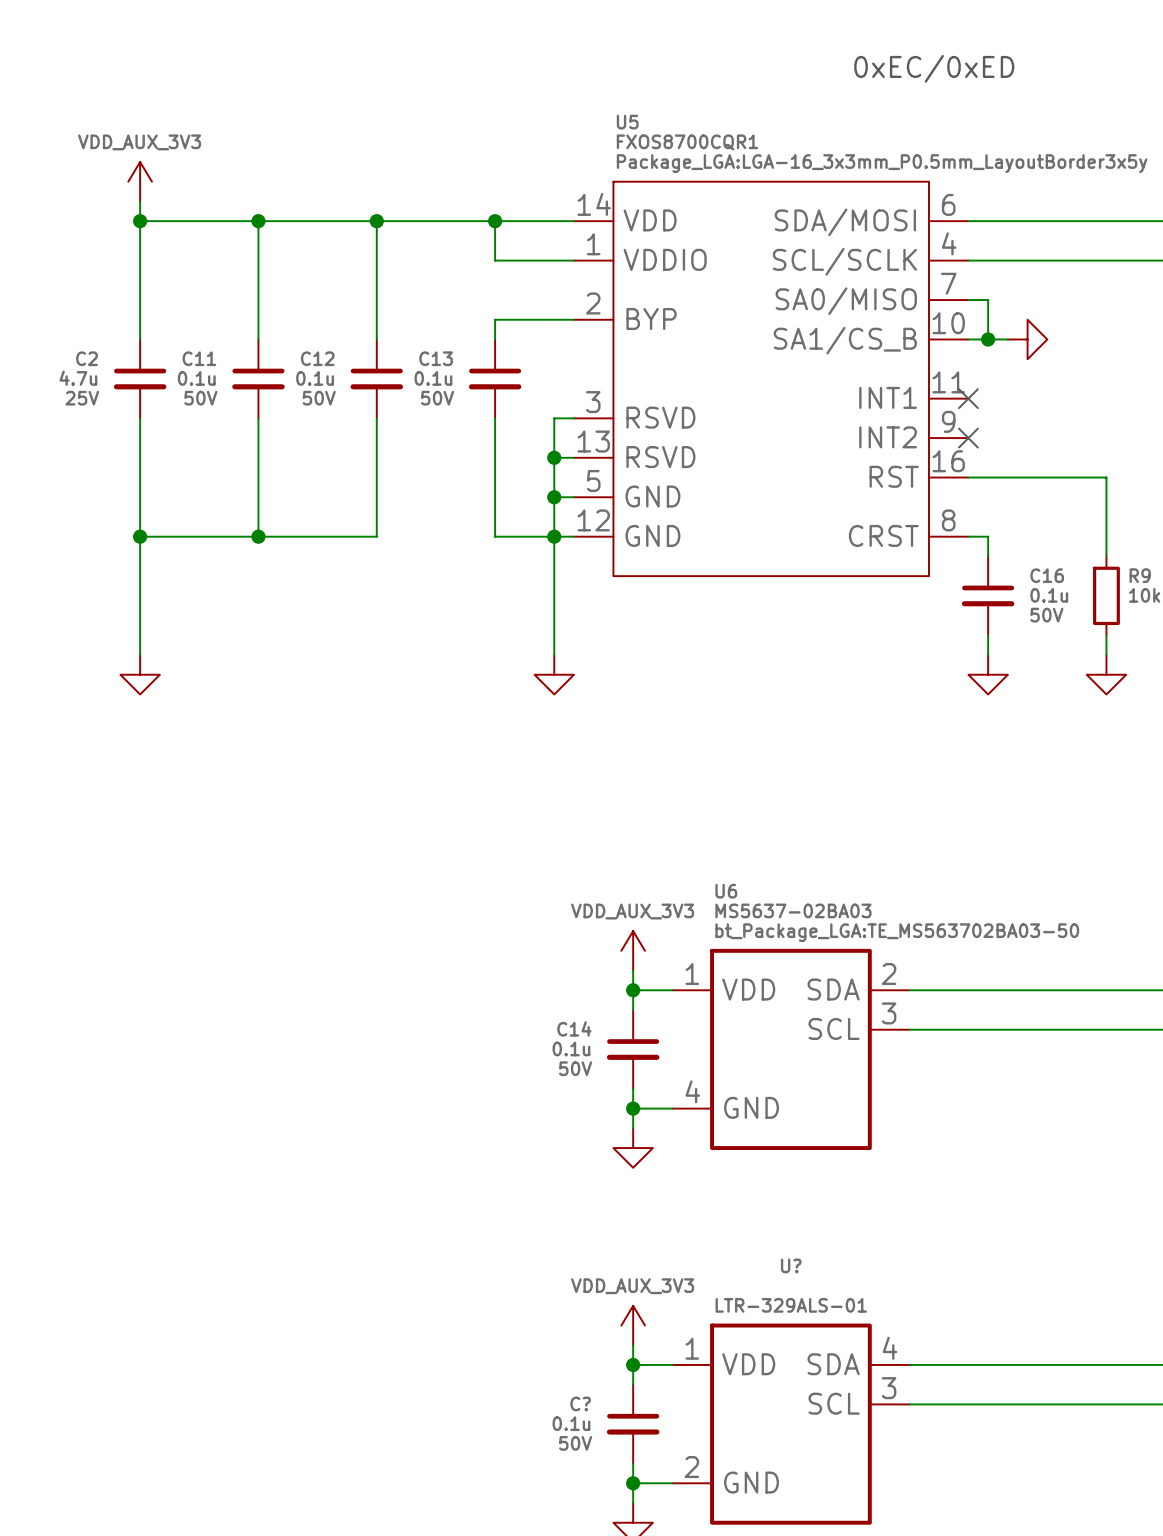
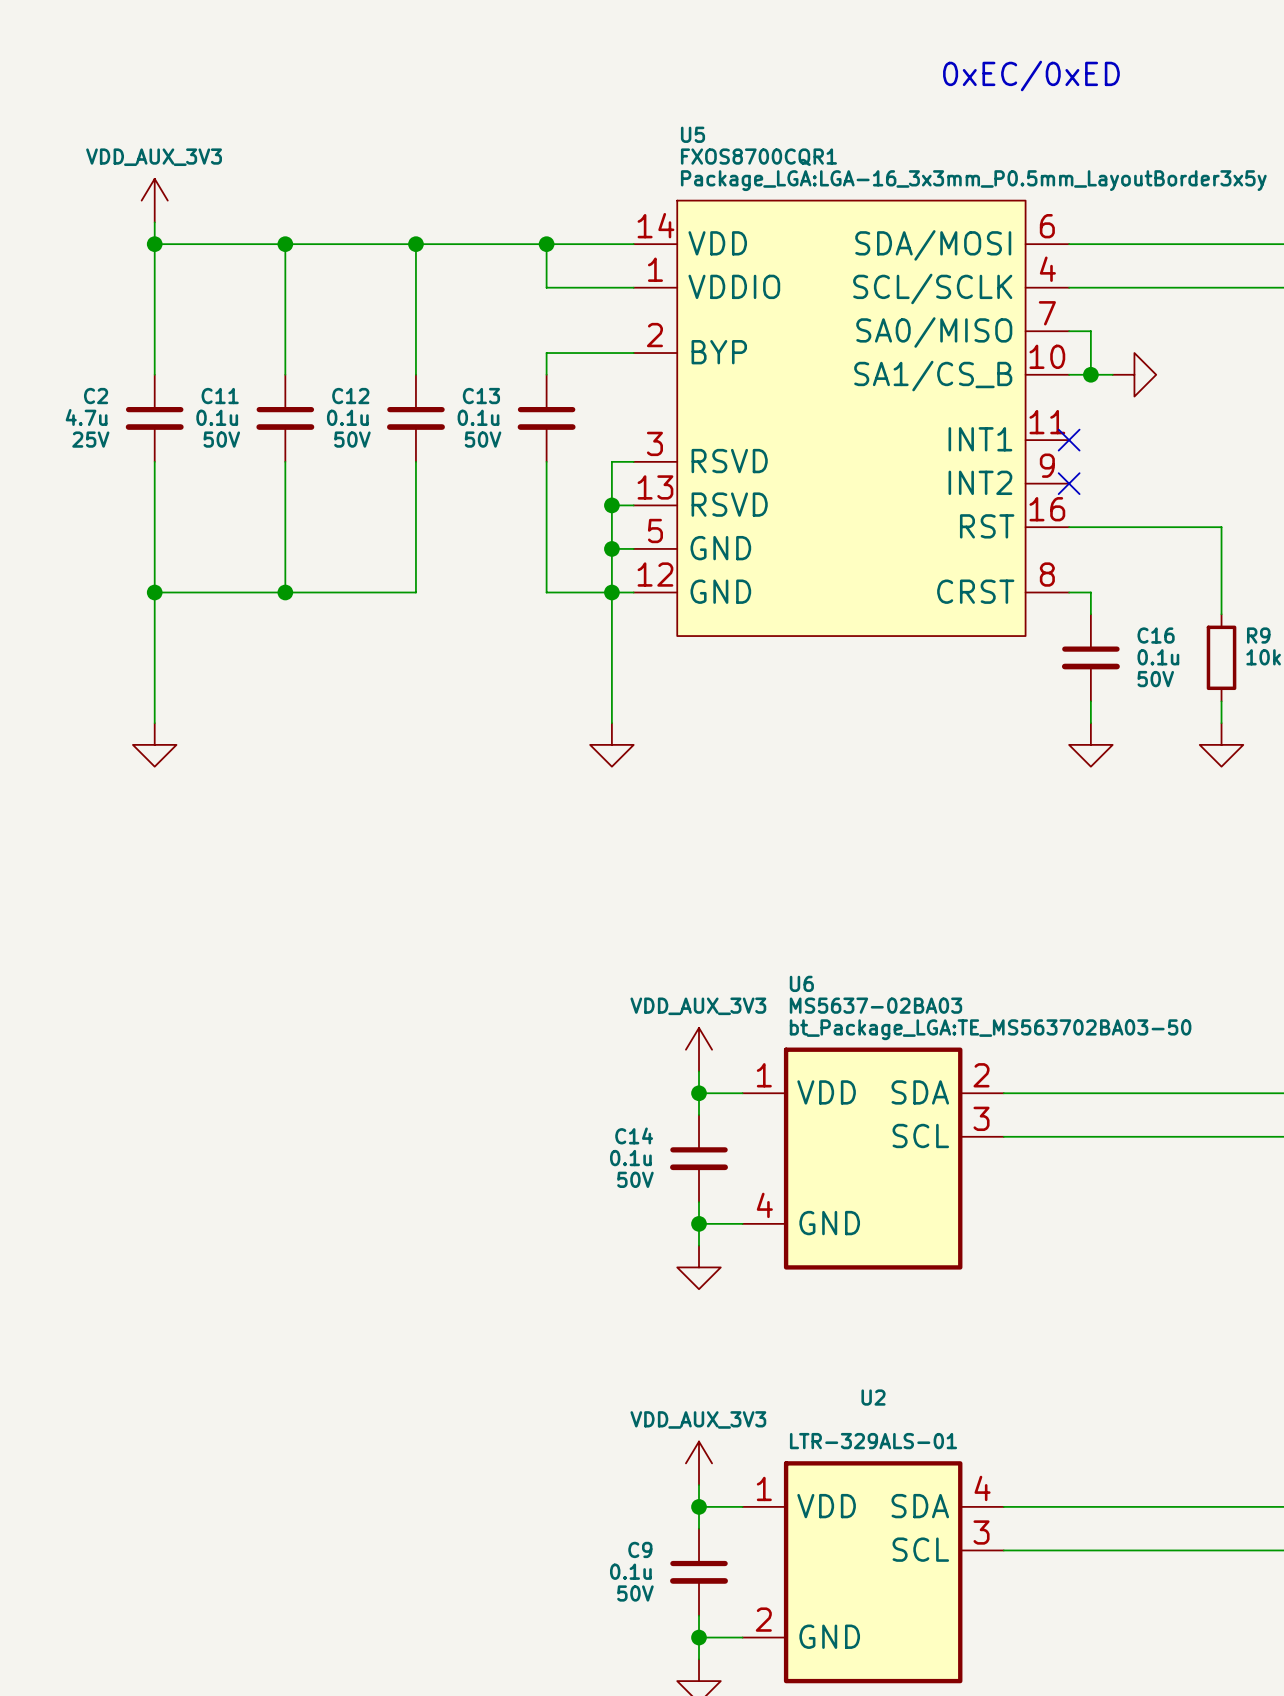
U? name: U? (791, 1265) -> U2 (873, 1397)
C? name: C? (580, 1403) -> C9 (640, 1549)

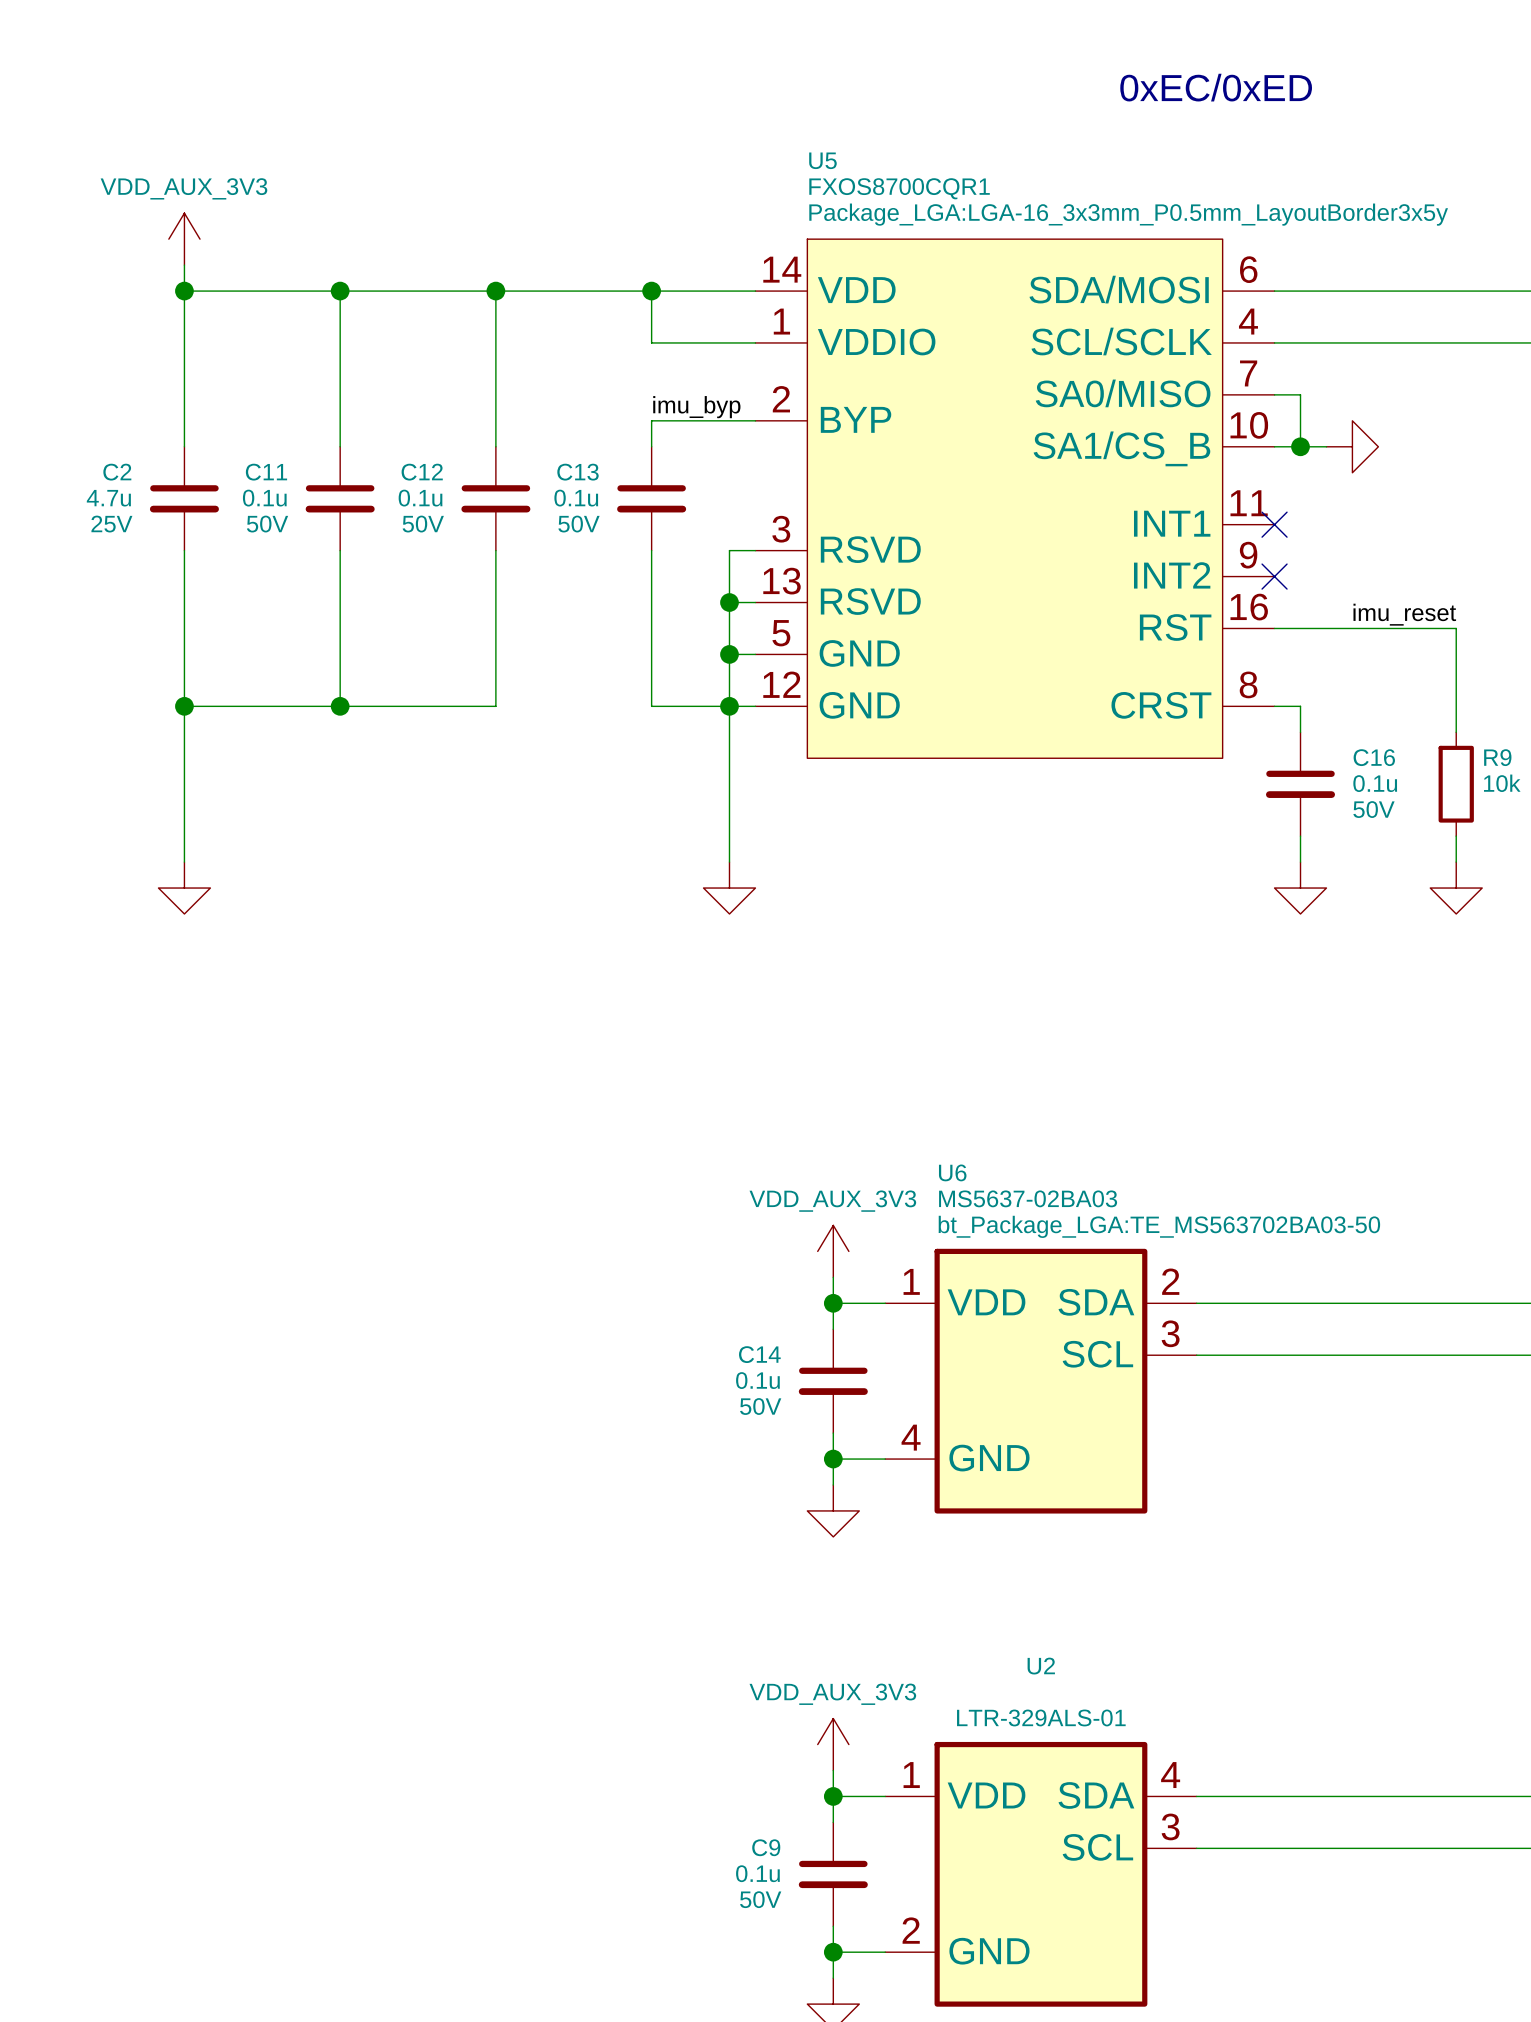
label: none -> imu_byp (696, 407)
label: none -> imu_reset (1404, 614)

